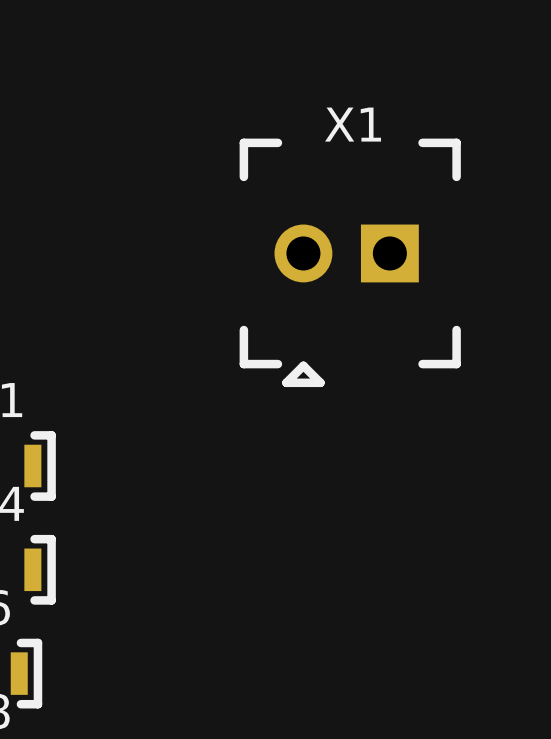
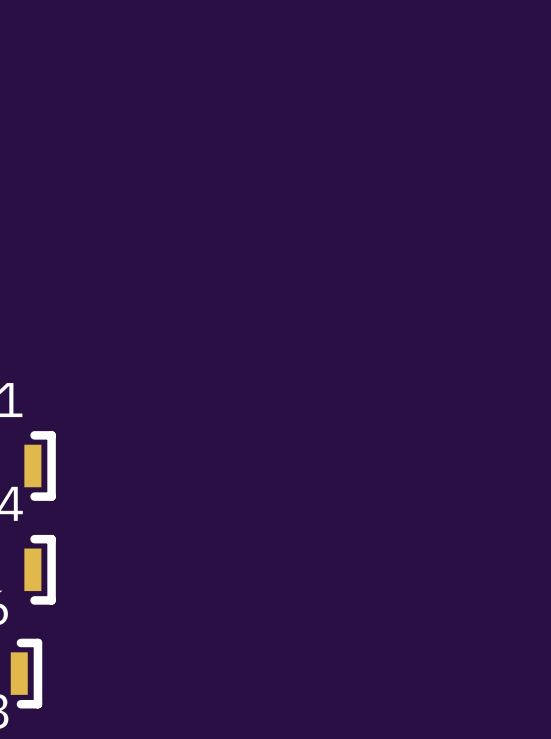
X1: (350, 262) -> none

